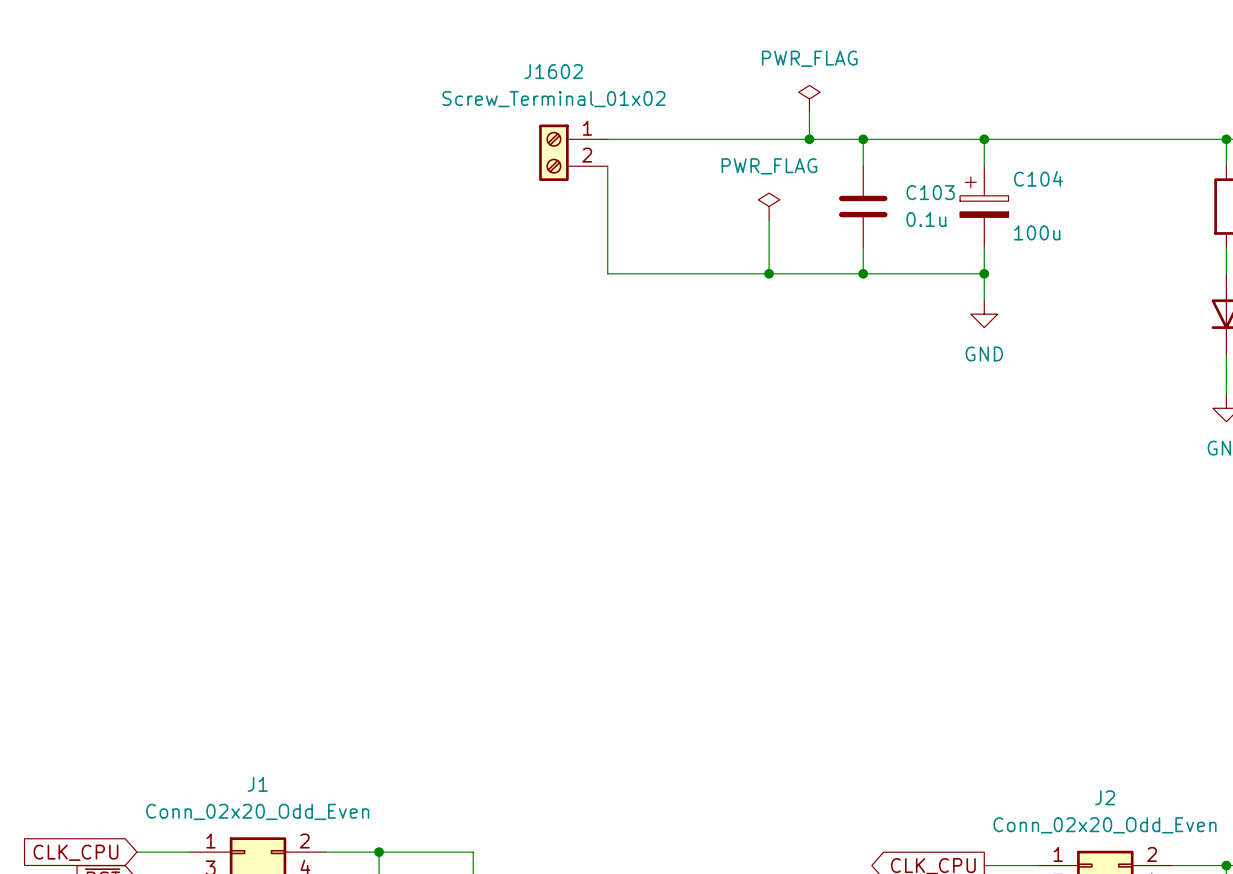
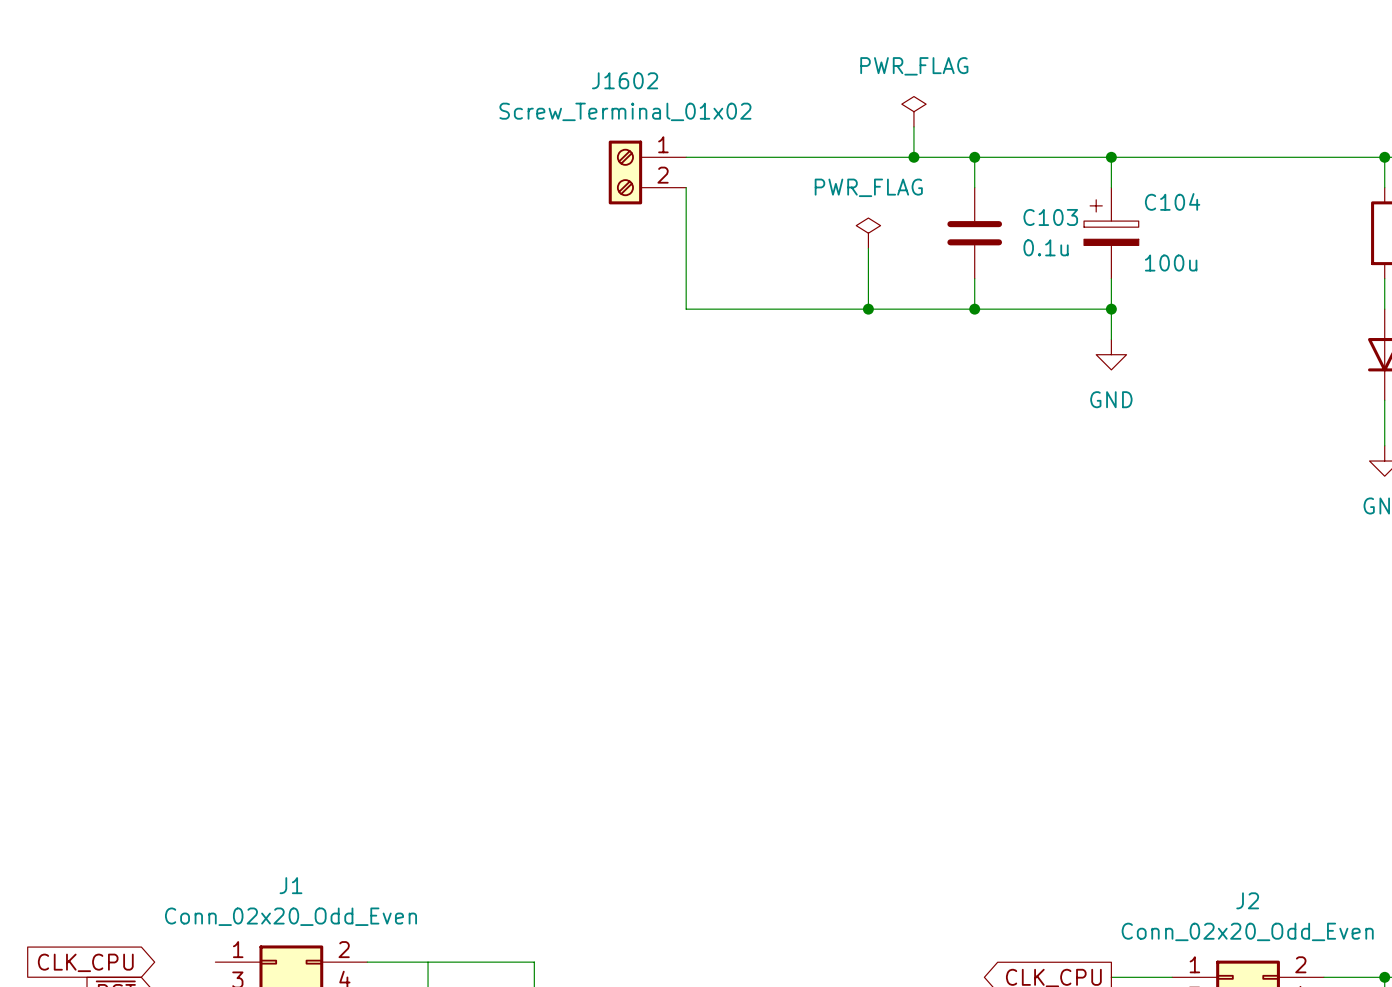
wire: (136, 852) (190, 852) -> none
junction: (379, 852) -> none

